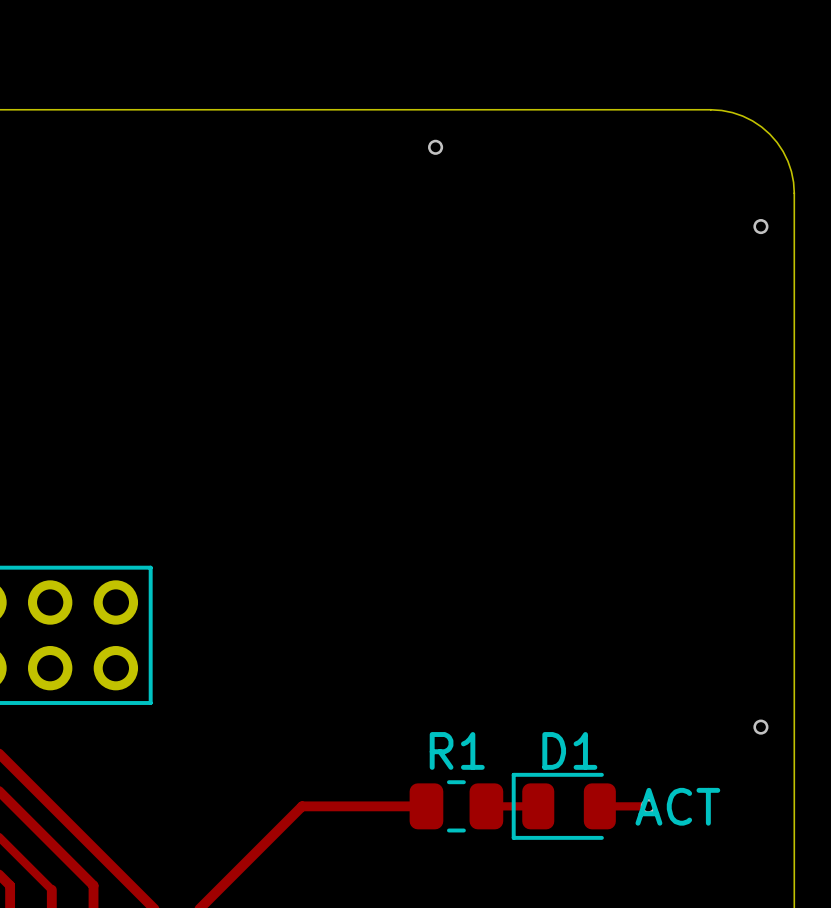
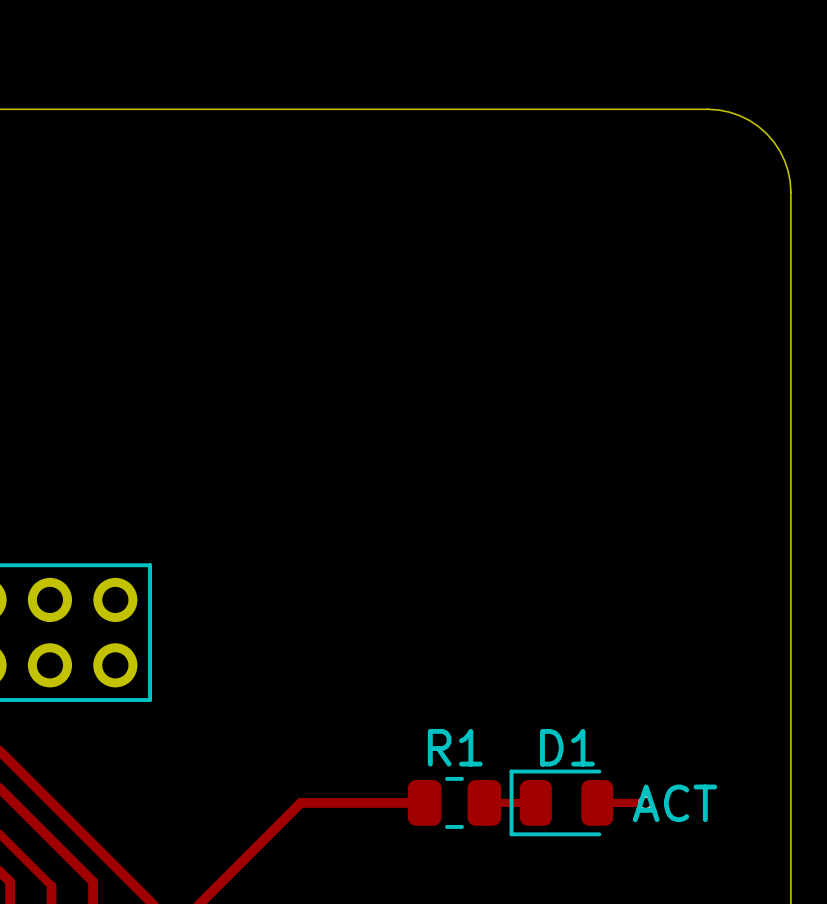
via: (435, 147) -> none
via: (760, 226) -> none
via: (760, 727) -> none

